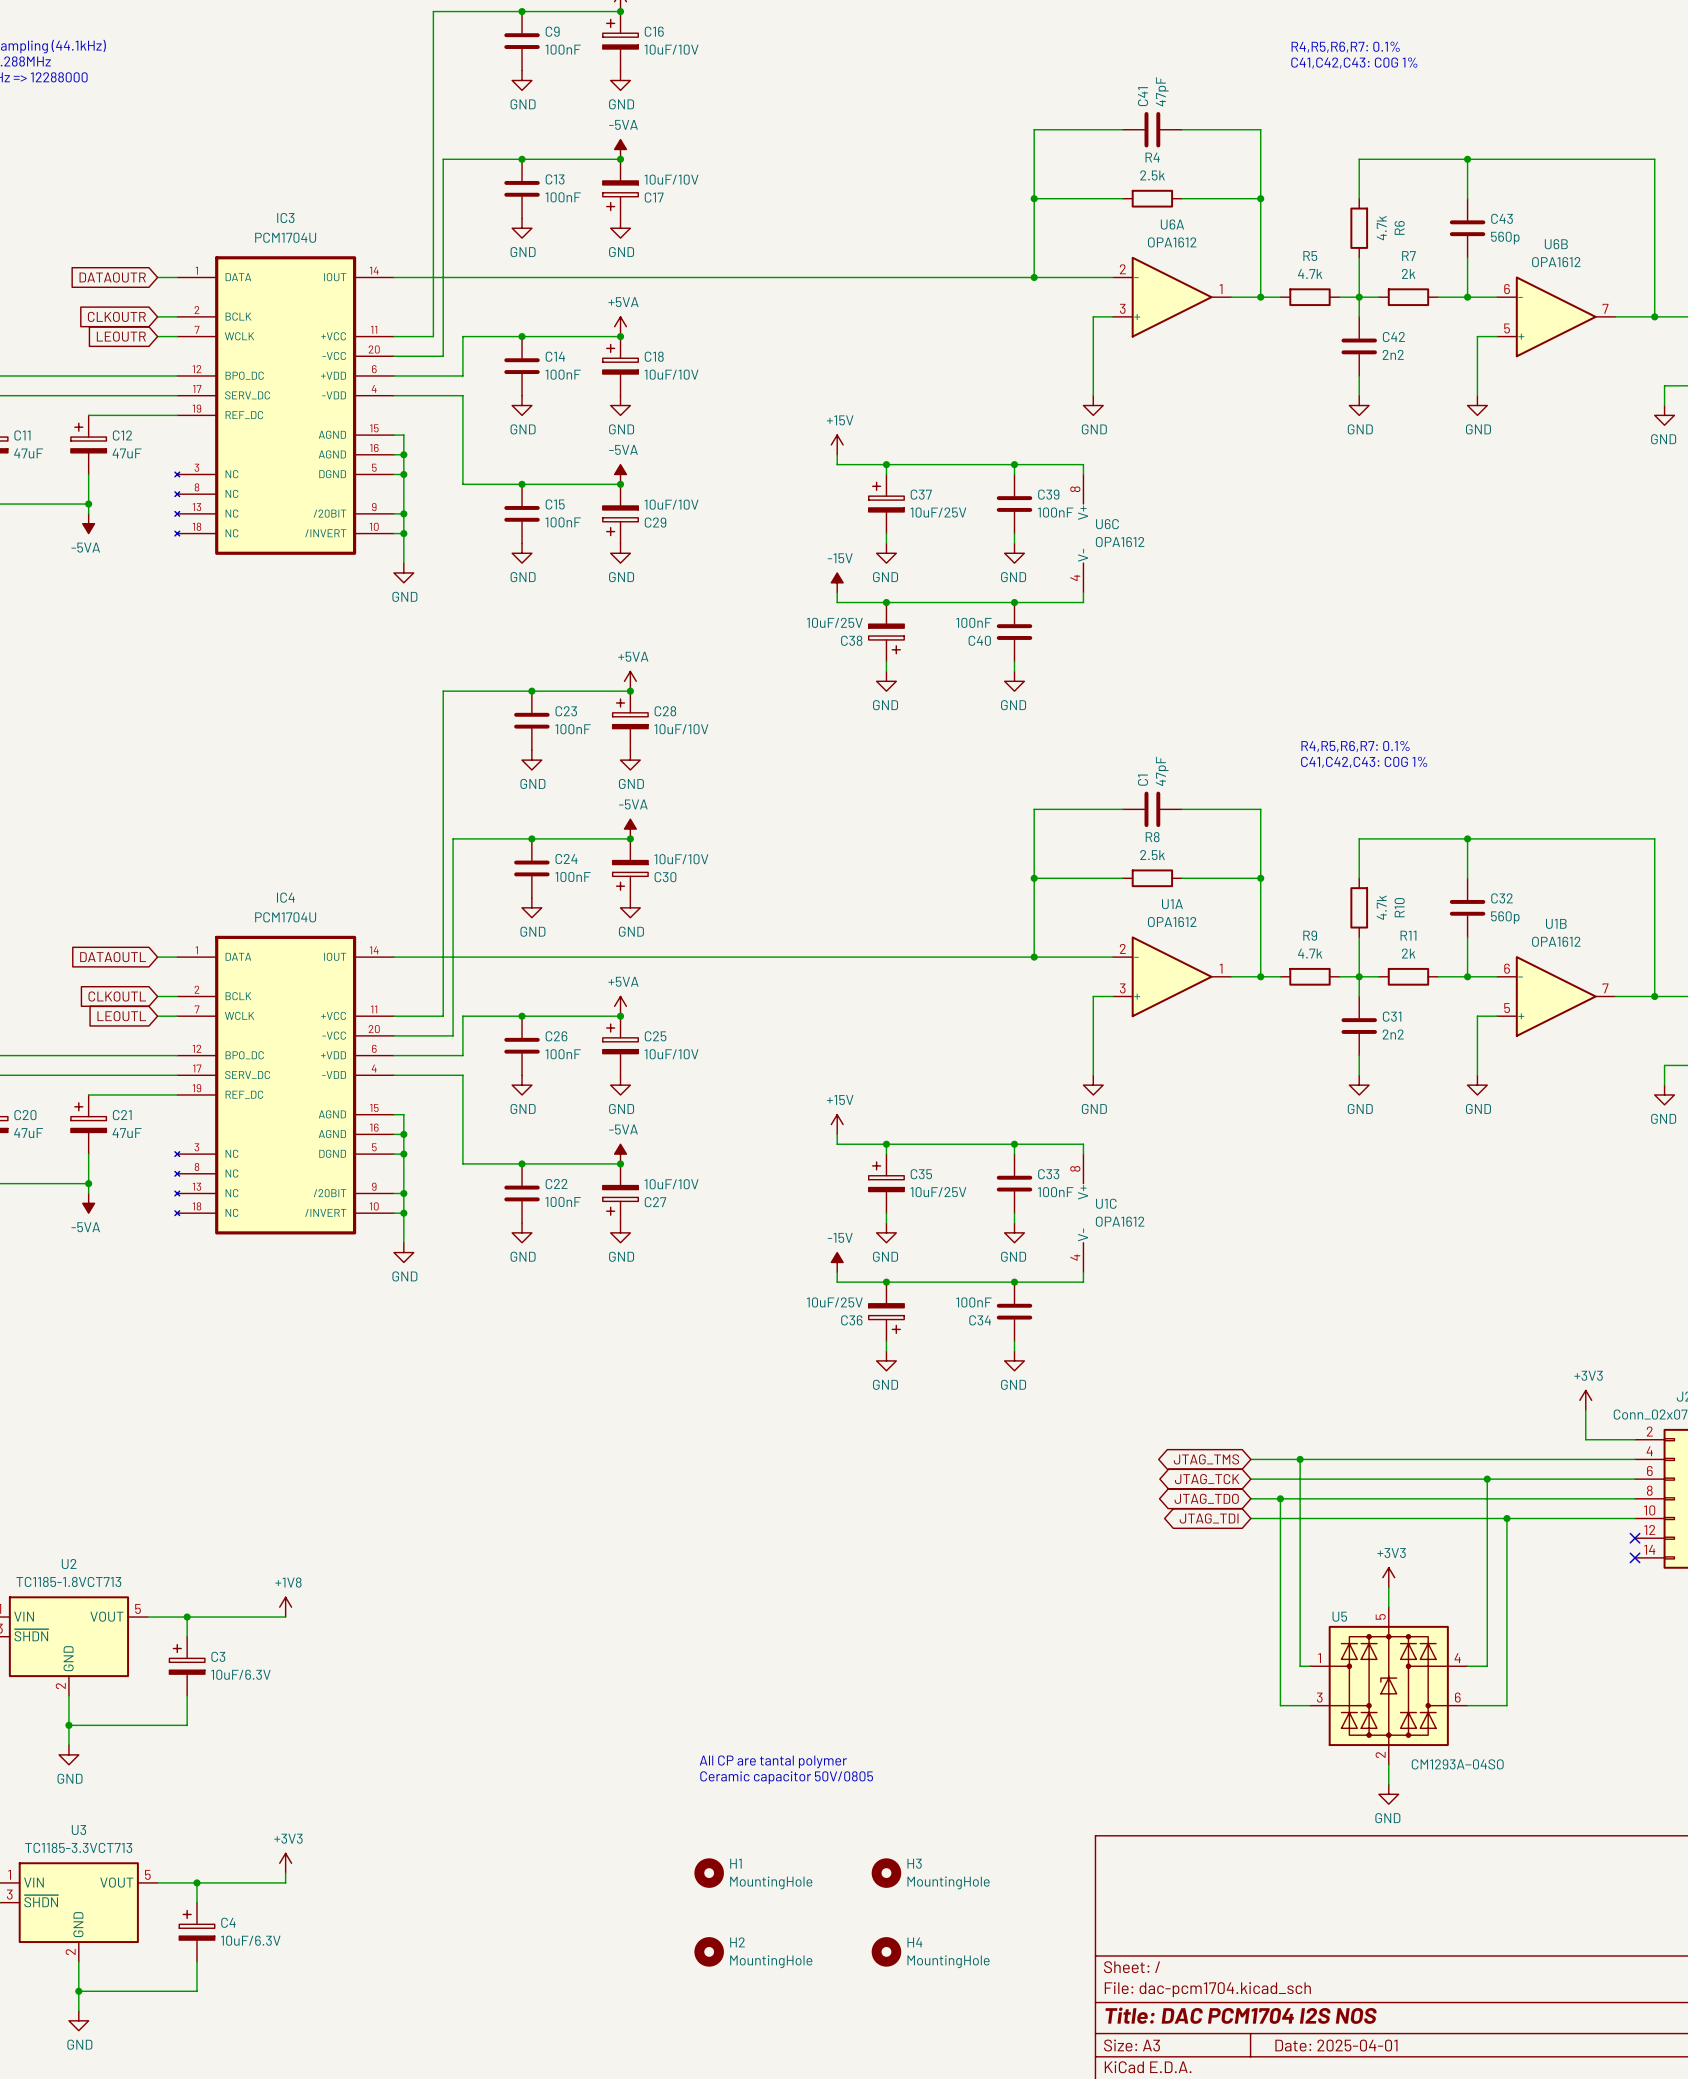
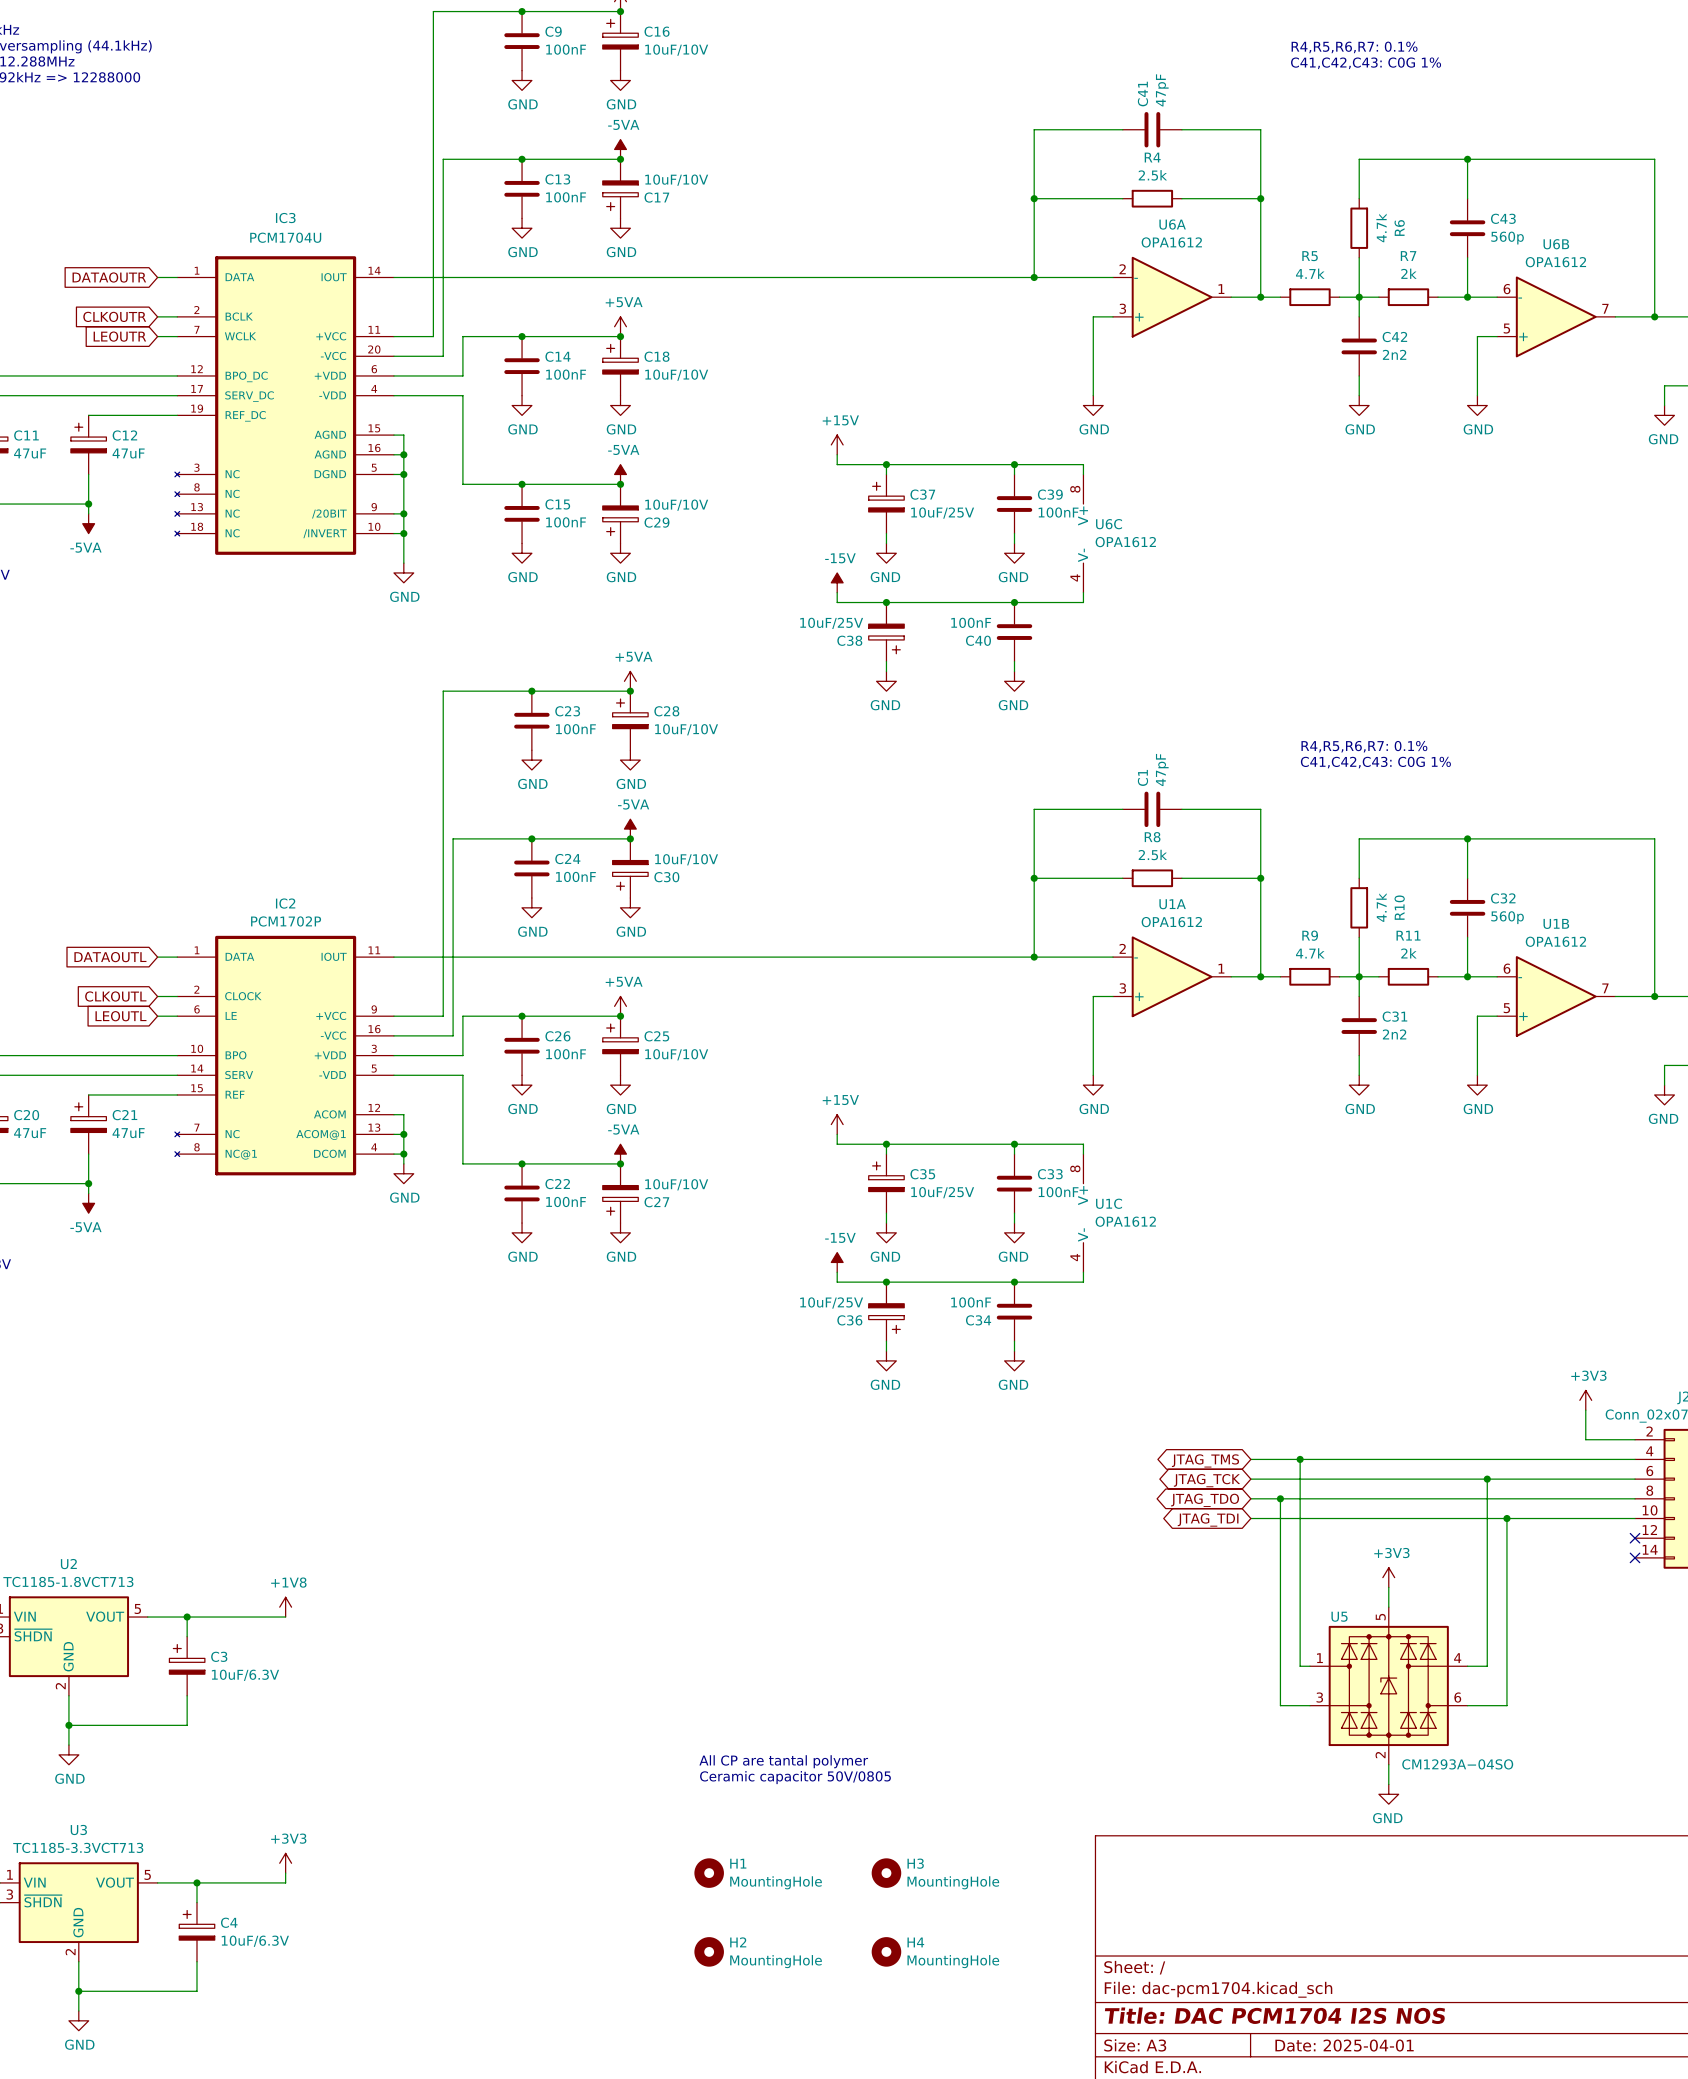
IC2: none -> PCM1702P (284, 1055)
IC4: PCM1704U (284, 1085) -> none
wire: (403, 1163) (403, 1242) -> none
junction: (403, 1193) -> none
wire: (393, 1213) (403, 1213) -> none
junction: (403, 1213) -> none
power symbol position: GND (403, 1252) -> GND (403, 1173)

